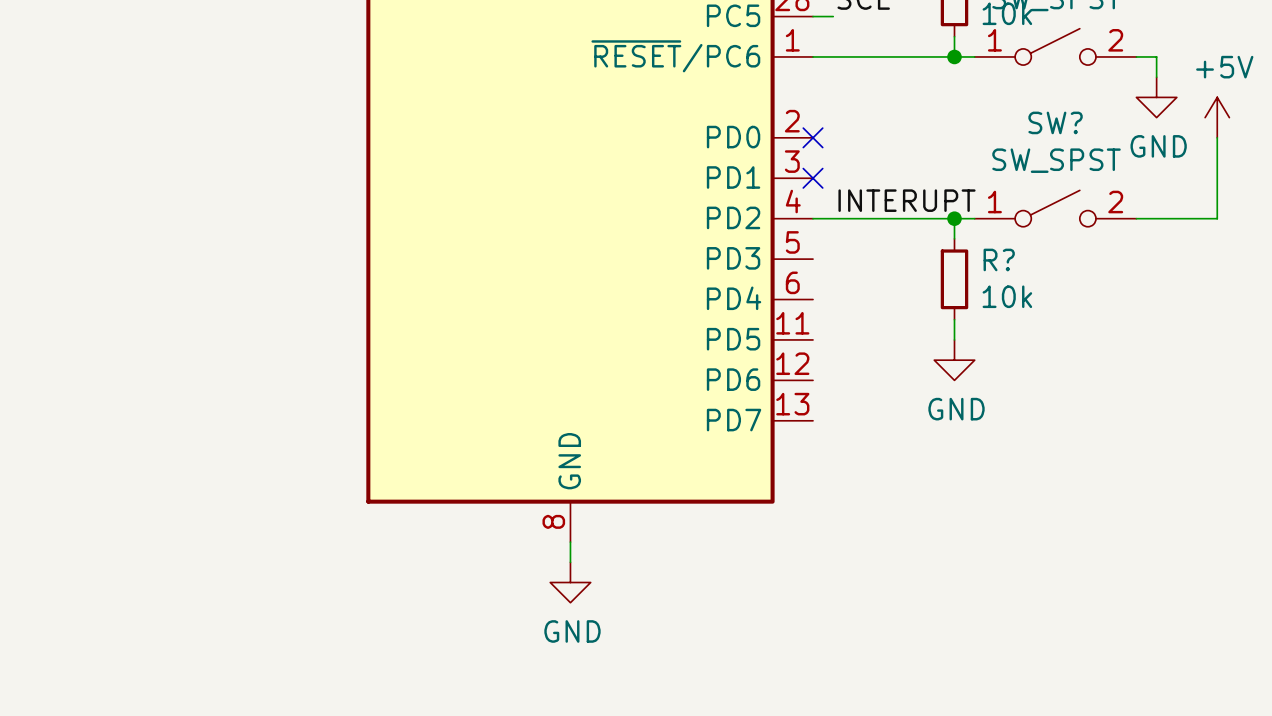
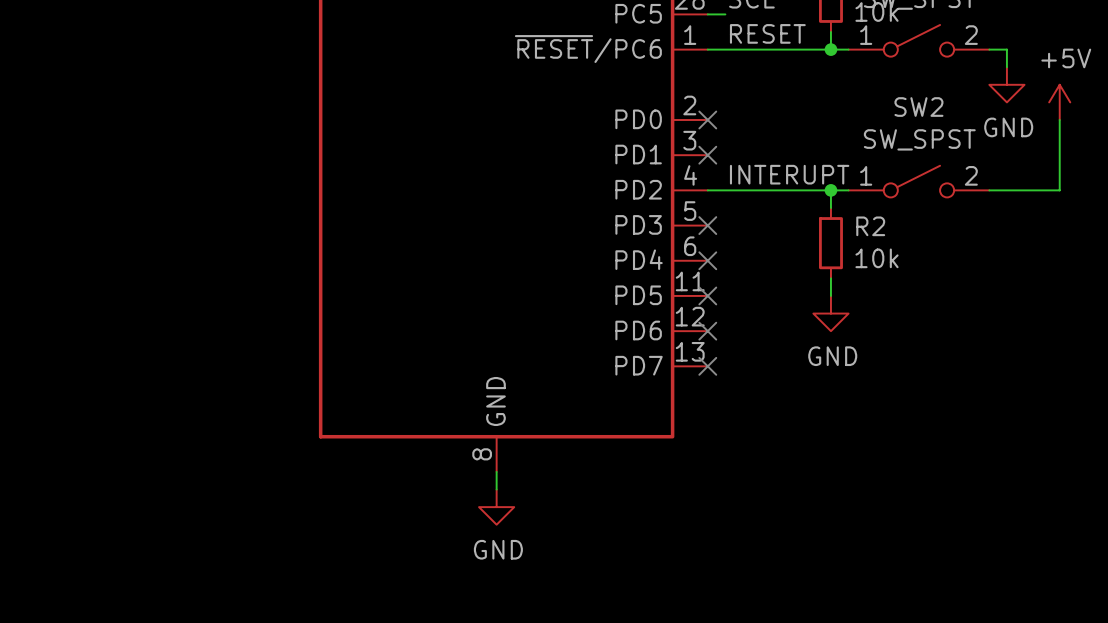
label: none -> RESET (767, 33)
SW? name: SW? (1055, 122) -> SW2 (918, 107)
no-connect mark: none -> (707, 225)
R? name: R? (999, 259) -> R2 (870, 226)
no-connect mark: none -> (707, 260)
no-connect mark: none -> (707, 295)
no-connect mark: none -> (707, 331)
no-connect mark: none -> (707, 366)

